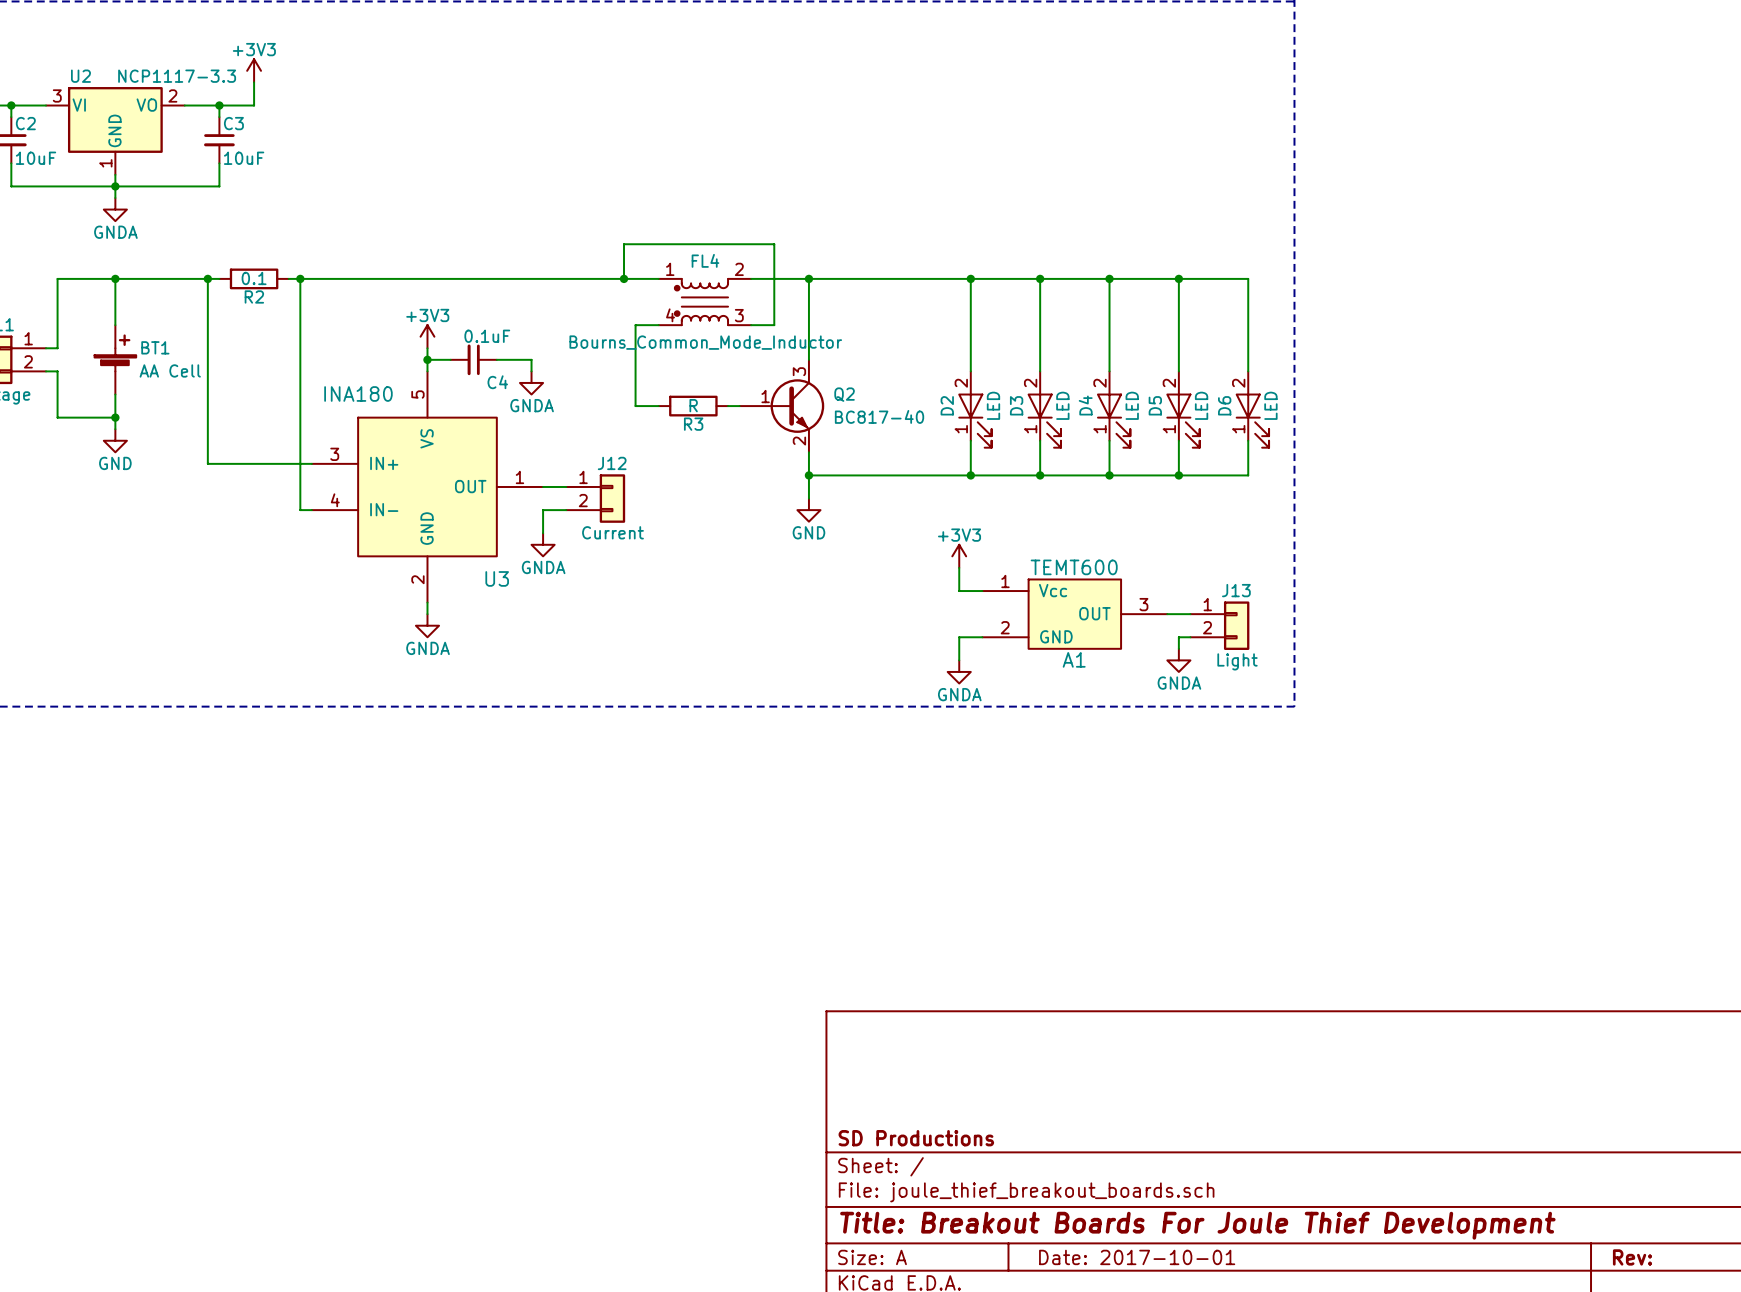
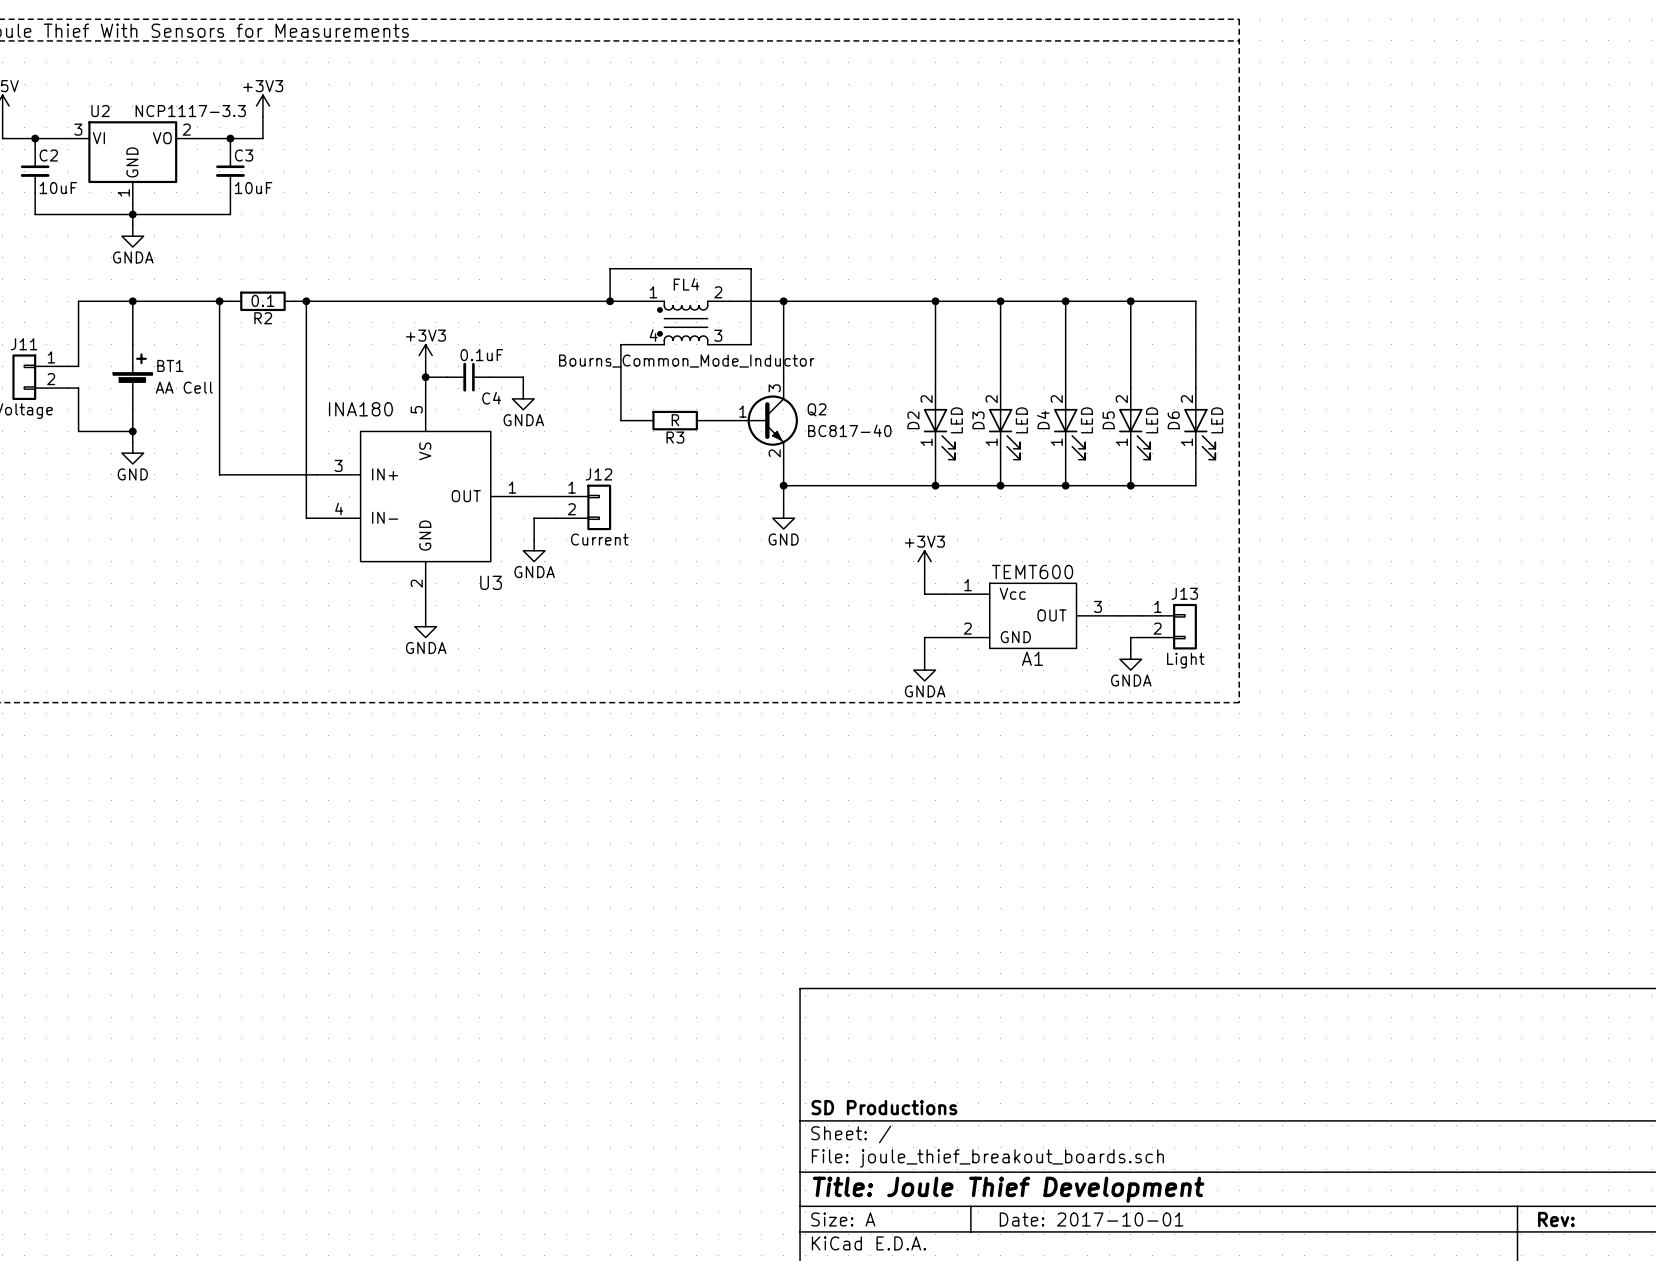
title block: Title: Breakout Boards For Joule Thief Development (1197, 1225) -> Title: Joule Thief Development (1008, 1189)

